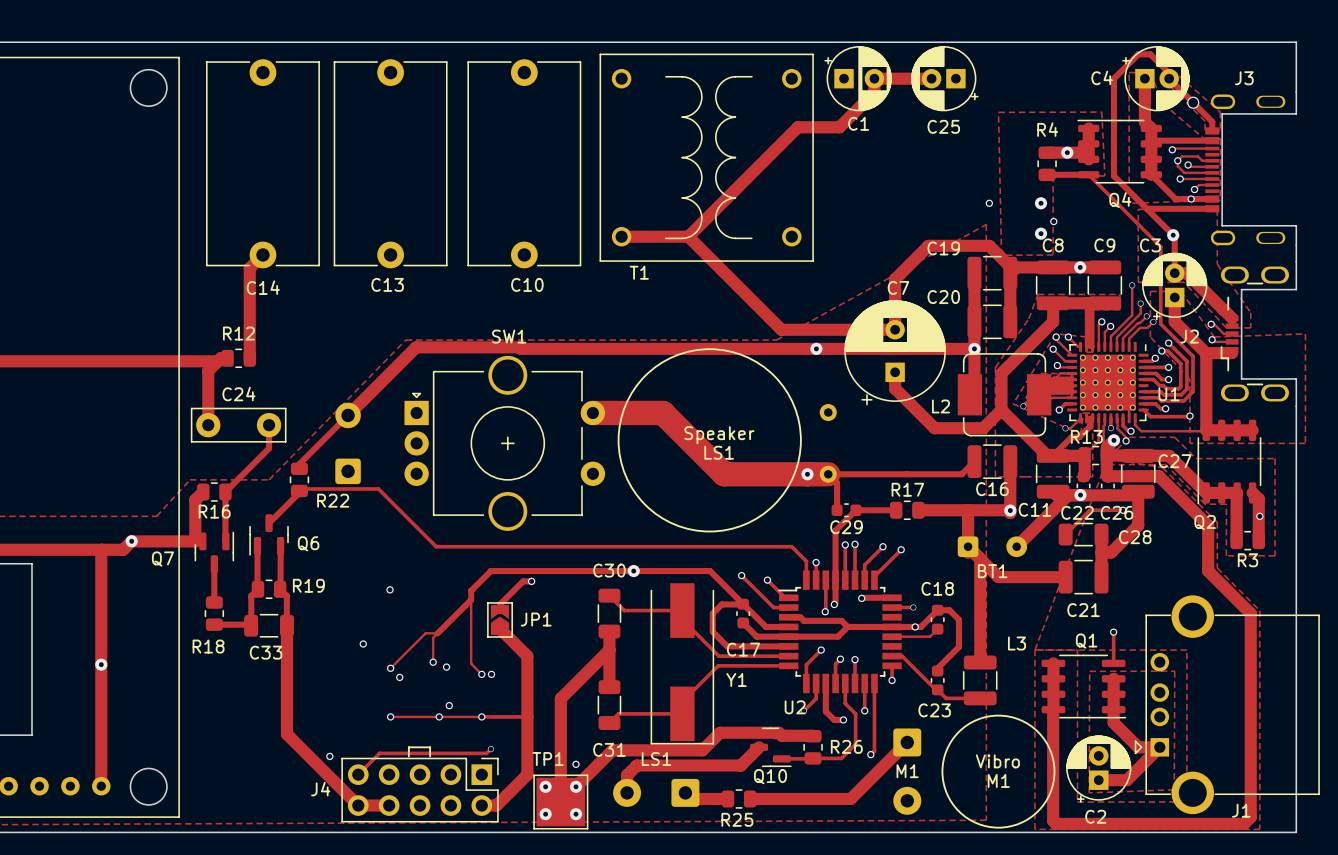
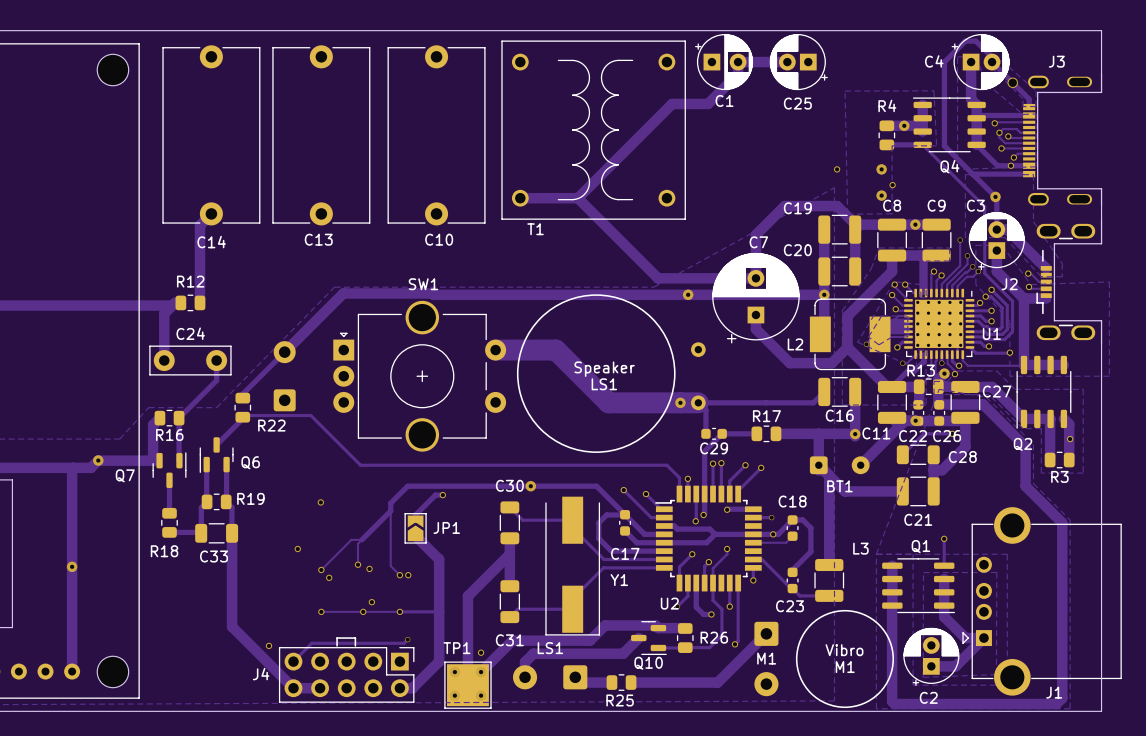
track: none -> (727, 549) (727, 554) (713, 568) (713, 583)
track: (855, 659) (855, 683) -> none
via position: (855, 659) -> (727, 549)

